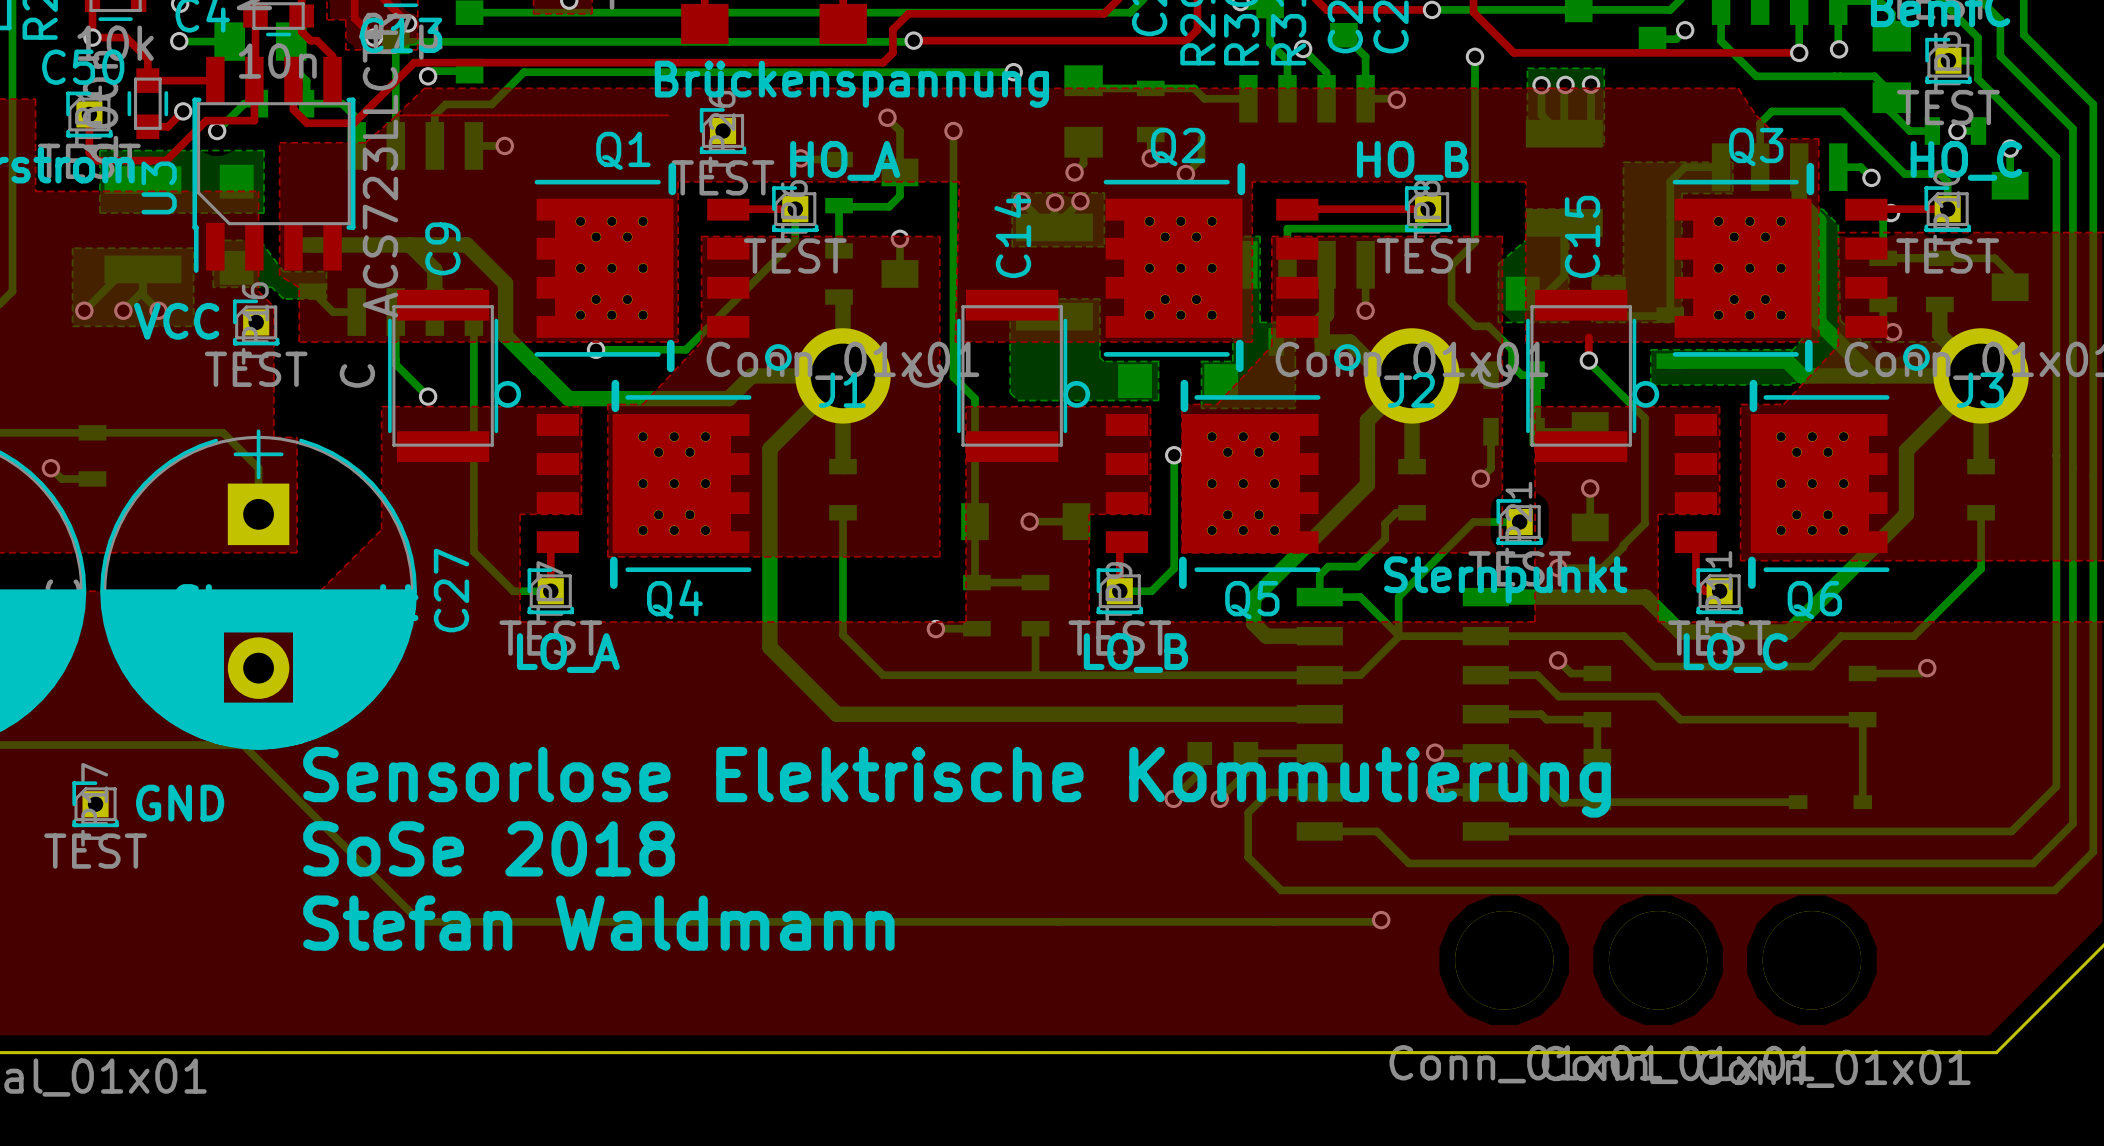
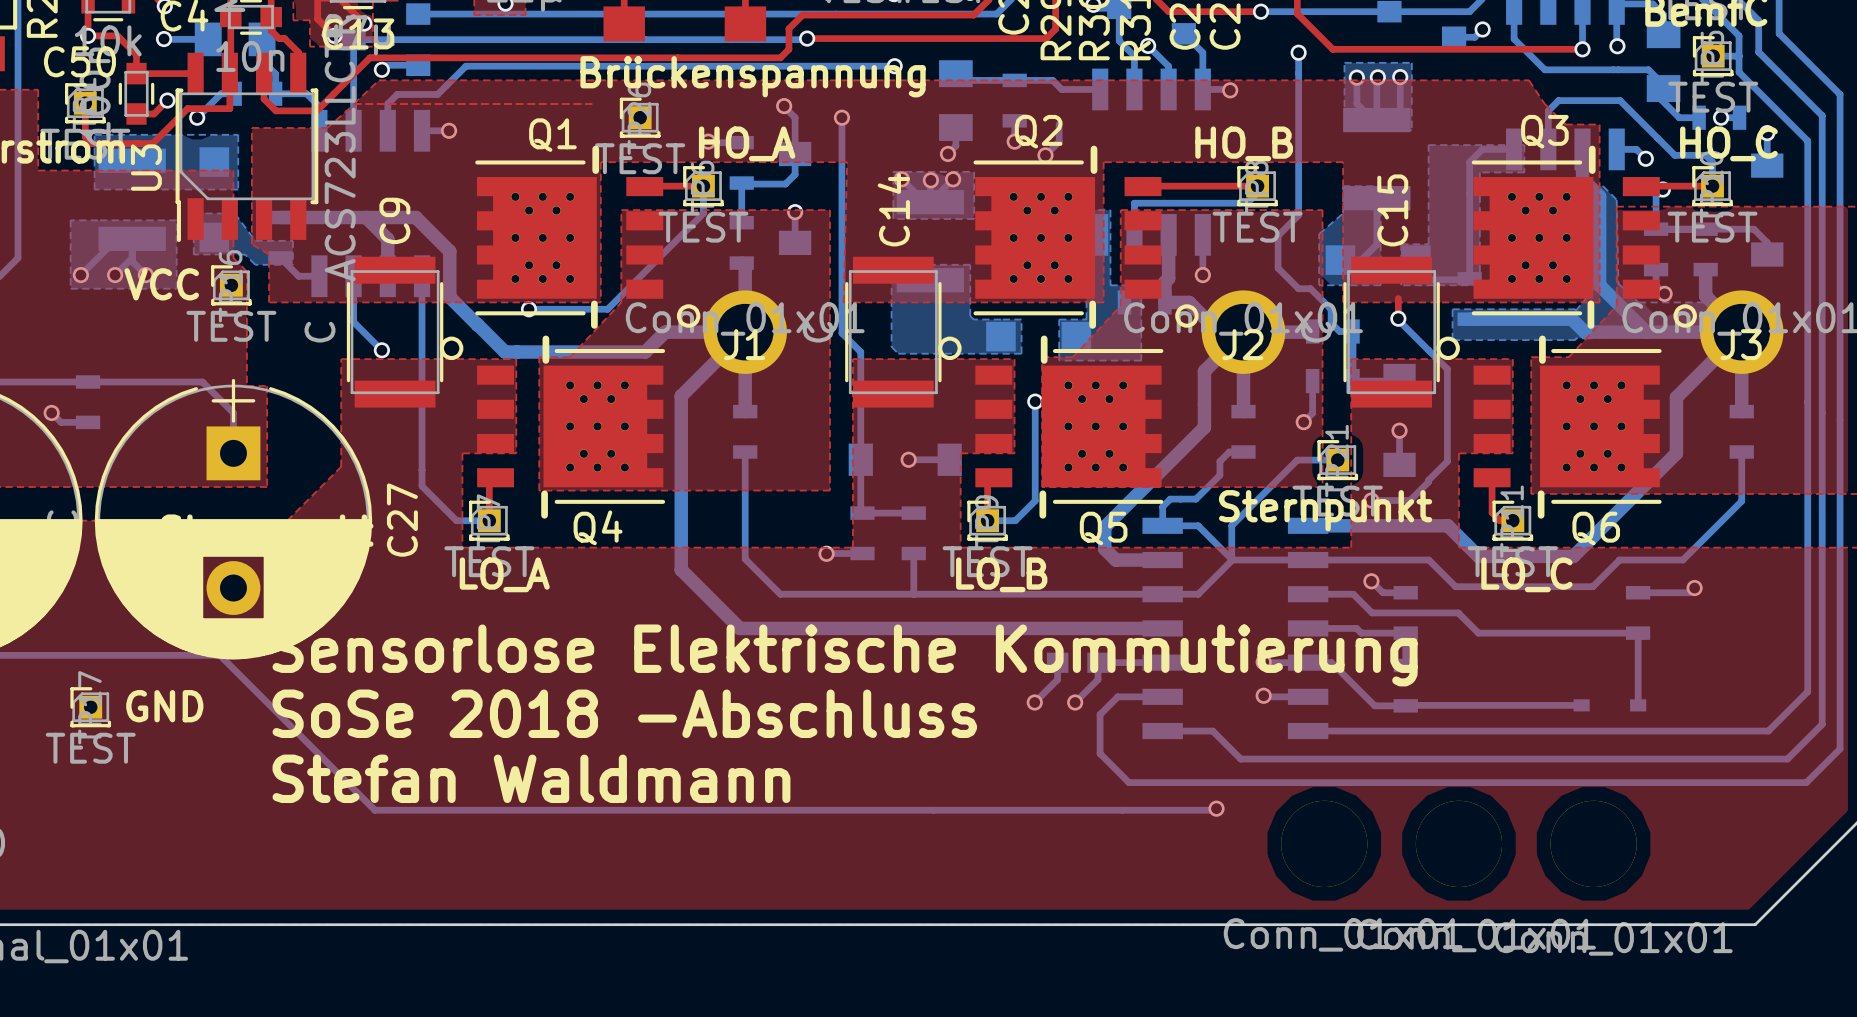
text position: Sensorlose Elektrische Kommutierung (957, 782) -> Sensorlose Elektrische Kommutierung (845, 655)
text: SoSe 2018 (489, 848) -> SoSe 2018 -Abschluss (624, 713)
text position: Stefan Waldmann (598, 923) -> Stefan Waldmann (531, 778)

